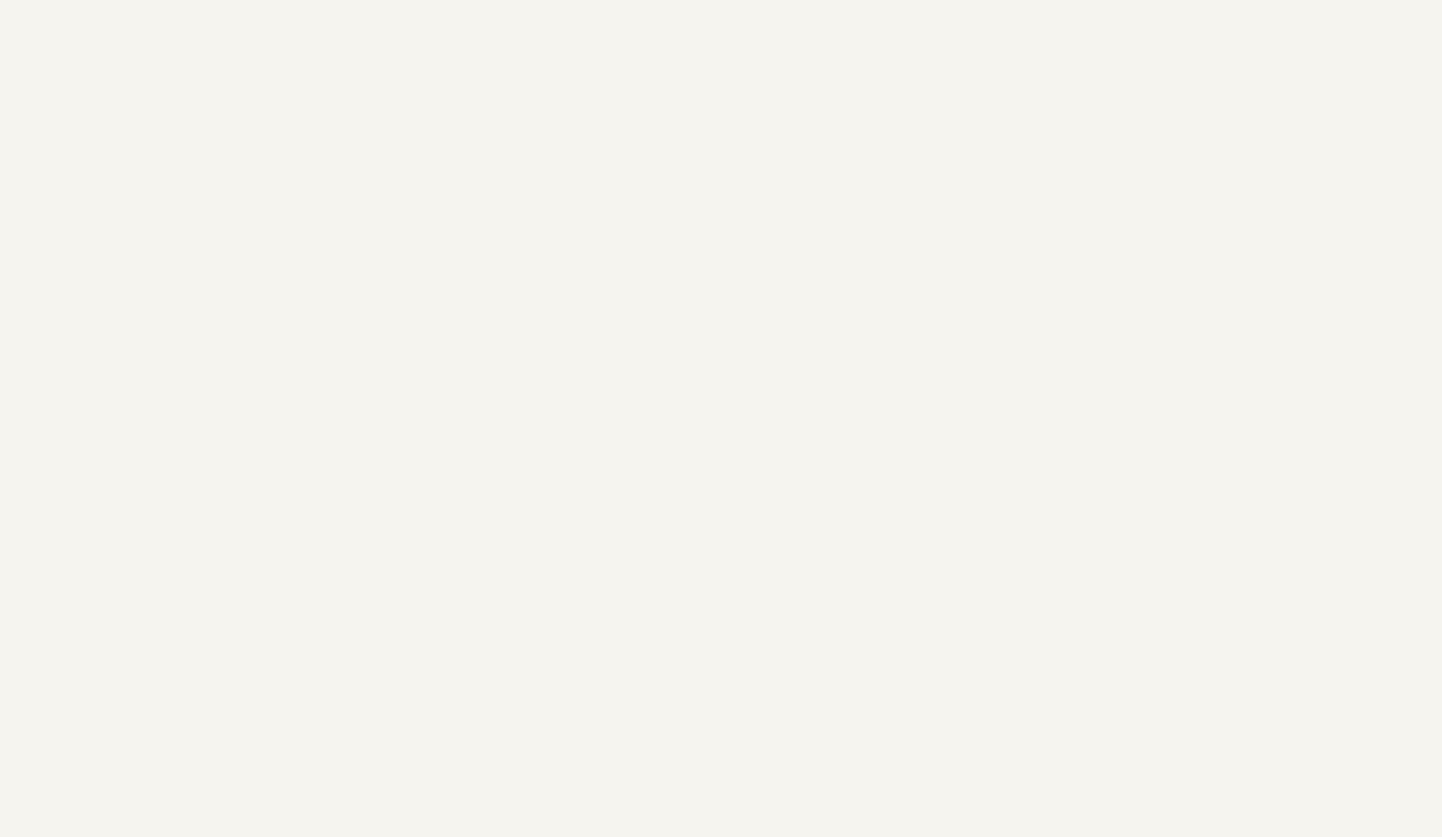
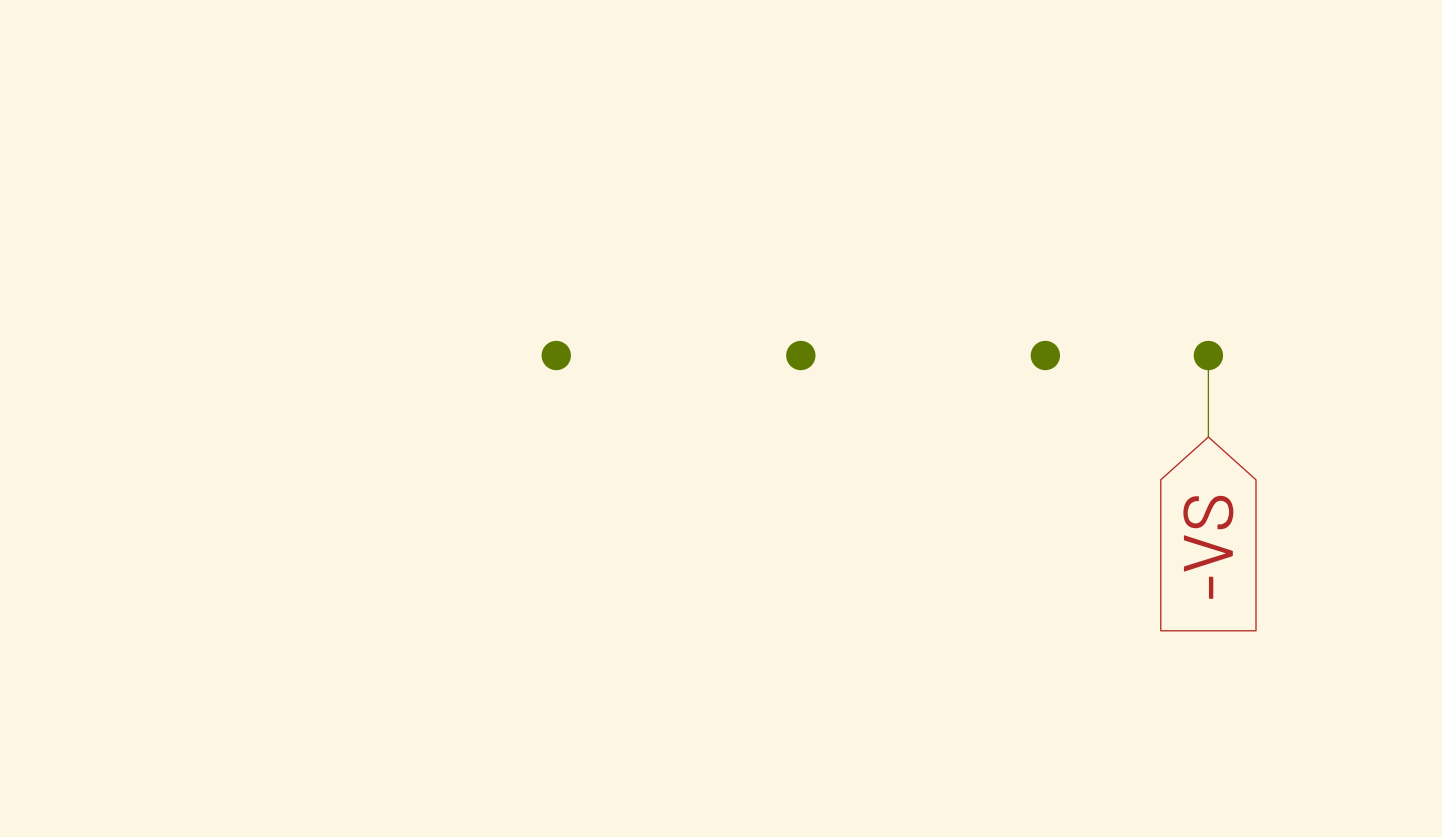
junction: none -> (556, 355)
junction: none -> (800, 355)
junction: none -> (1045, 355)
wire: none -> (1208, 355) (1208, 437)
junction: none -> (1208, 355)
global label: none -> -VS (1208, 547)

